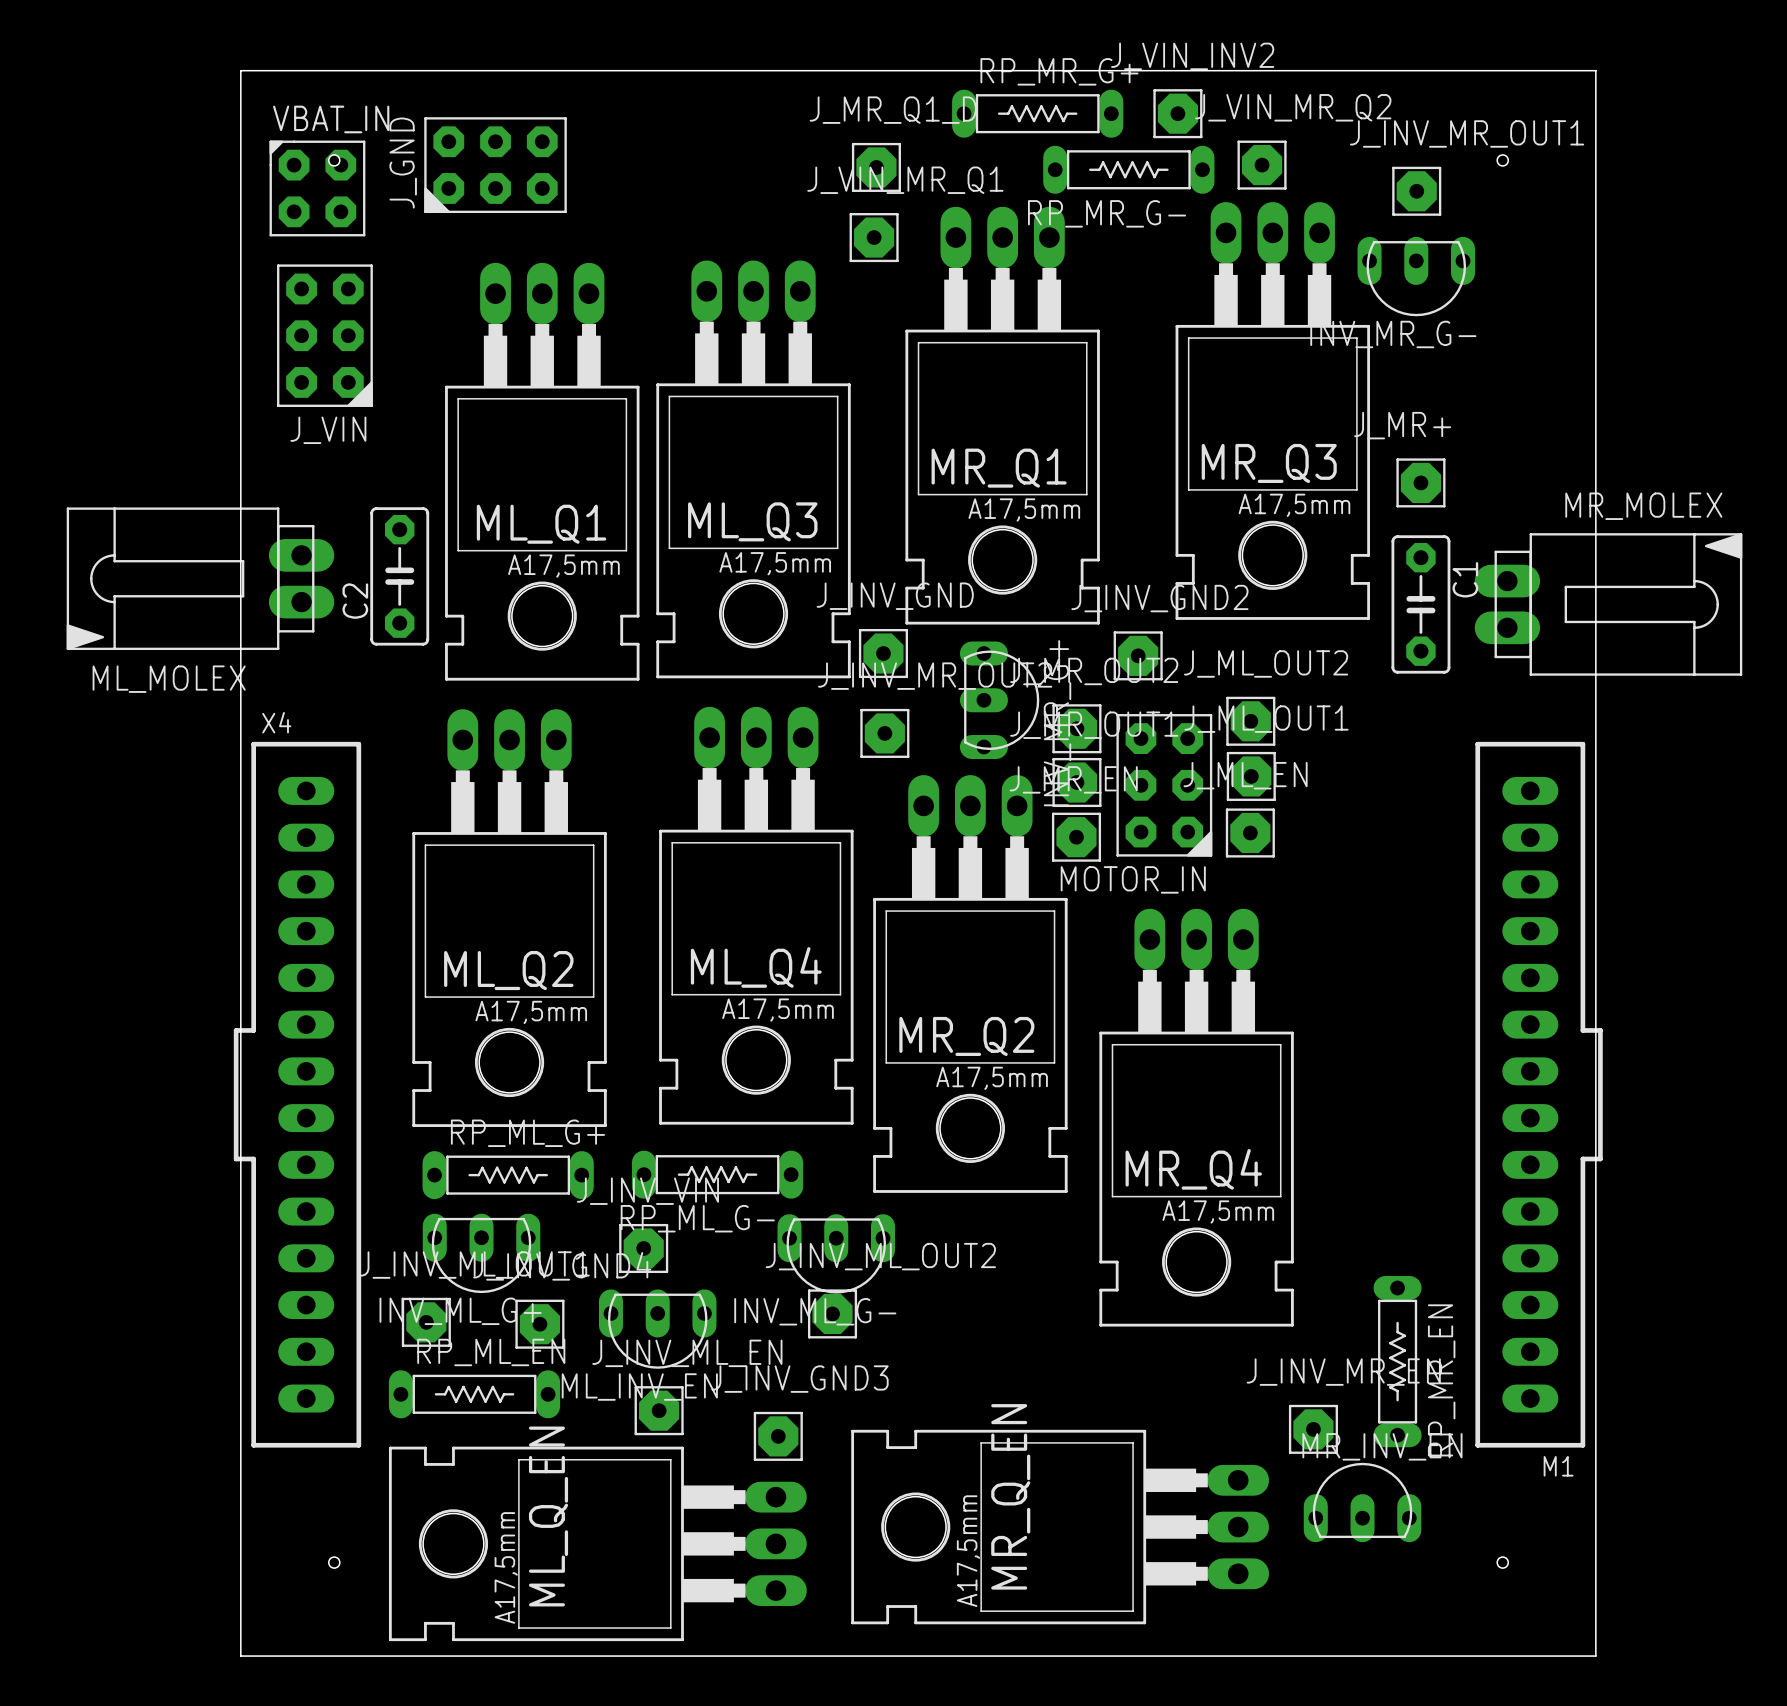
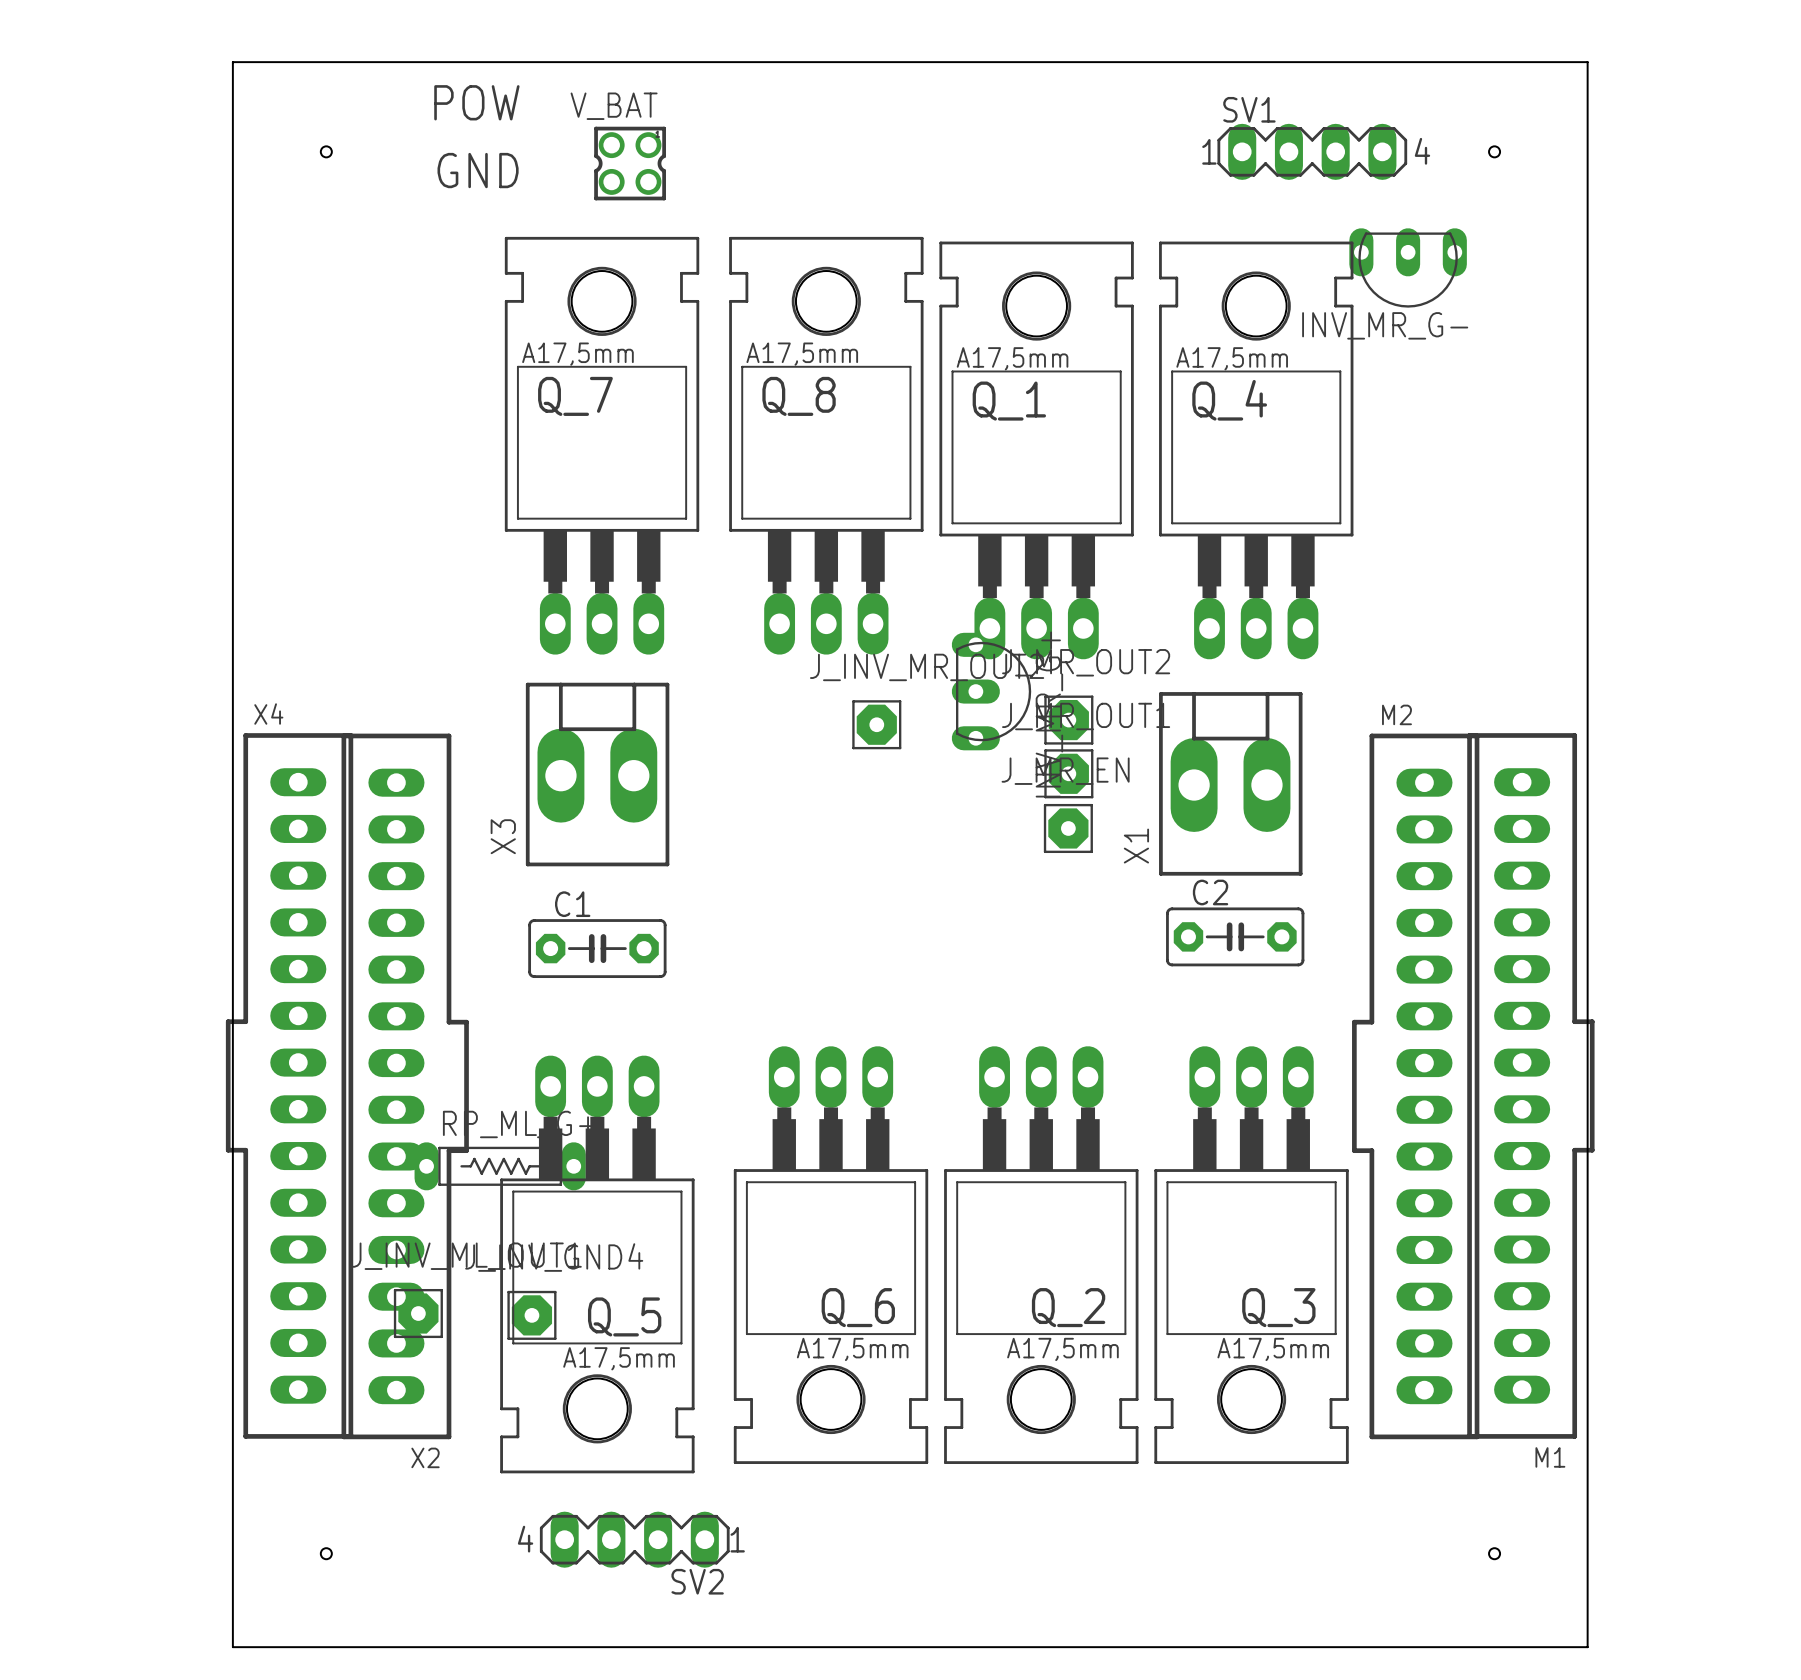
text: none -> POW (476, 102)
RP_MR_G+: (1037, 113) -> none
J_VIN_INV2: (1177, 113) -> none
SV1: none -> (1312, 151)
J_GND: (495, 165) -> none
J_VIN_MR_Q2: (1262, 165) -> none
J_MR_Q1_D: (876, 167) -> none
RP_MR_G-: (1128, 169) -> none
V_BAT: none -> (630, 163)
text: none -> GND (478, 170)
VBAT_IN: (317, 188) -> none
J_INV_MR_OUT1: (1416, 191) -> none
J_VIN_MR_Q1: (874, 237) -> none
J_VIN: (324, 335) -> none
MR_Q3: (1272, 410) -> none
MR_Q1: (1002, 415) -> none
Q_7: none -> (602, 445)
Q_8: none -> (826, 445)
Q_1: none -> (1036, 450)
Q_4: none -> (1256, 450)
ML_Q3: (753, 469) -> none
ML_Q1: (542, 471) -> none
J_MR+: (1420, 482) -> none
C2 rotation: 0° (399, 576) -> 90° clockwise (1235, 936)
C2 position: (399, 576) -> (1235, 936)
ML_MOLEX: (200, 578) -> none
C1 rotation: 0° (1420, 604) -> 90° counterclockwise (597, 948)
C1 position: (1420, 604) -> (597, 948)
MR_MOLEX: (1608, 604) -> none
J_INV_GND: (883, 653) -> none
J_INV_GND2: (1138, 655) -> none
J_ML_OUT2: (1250, 721) -> none
J_ML_OUT1: (1251, 776) -> none
X3: none -> (597, 774)
MOTOR_IN: (1164, 785) -> none
X1: none -> (1230, 783)
J_ML_EN: (1250, 832) -> none
ML_Q4: (756, 915) -> none
ML_Q2: (509, 918) -> none
MR_Q2: (970, 983) -> none
X2: none -> (405, 1086)
M2: none -> (1415, 1086)
MR_Q4: (1196, 1117) -> none
RP_ML_G-: (717, 1174) -> none
J_INV_VIN: (643, 1248) -> none
INV_ML_G+: (481, 1253) -> none
INV_ML_G-: (836, 1253) -> none
Q_6: none -> (831, 1255)
Q_2: none -> (1041, 1255)
Q_3: none -> (1251, 1255)
Q_5: none -> (597, 1264)
J_INV_ML_OUT2: (832, 1313) -> none
ML_INV_EN: (657, 1329) -> none
RP_MR_EN: (1397, 1361) -> none
RP_ML_EN: (474, 1394) -> none
J_INV_ML_EN: (659, 1410) -> none
J_INV_MR_EN: (1313, 1429) -> none
J_INV_GND3: (778, 1436) -> none
MR_INV_EN: (1362, 1502) -> none
MR_Q_EN: (1060, 1527) -> none
ML_Q_EN: (597, 1543) -> none
SV2: none -> (634, 1539)

